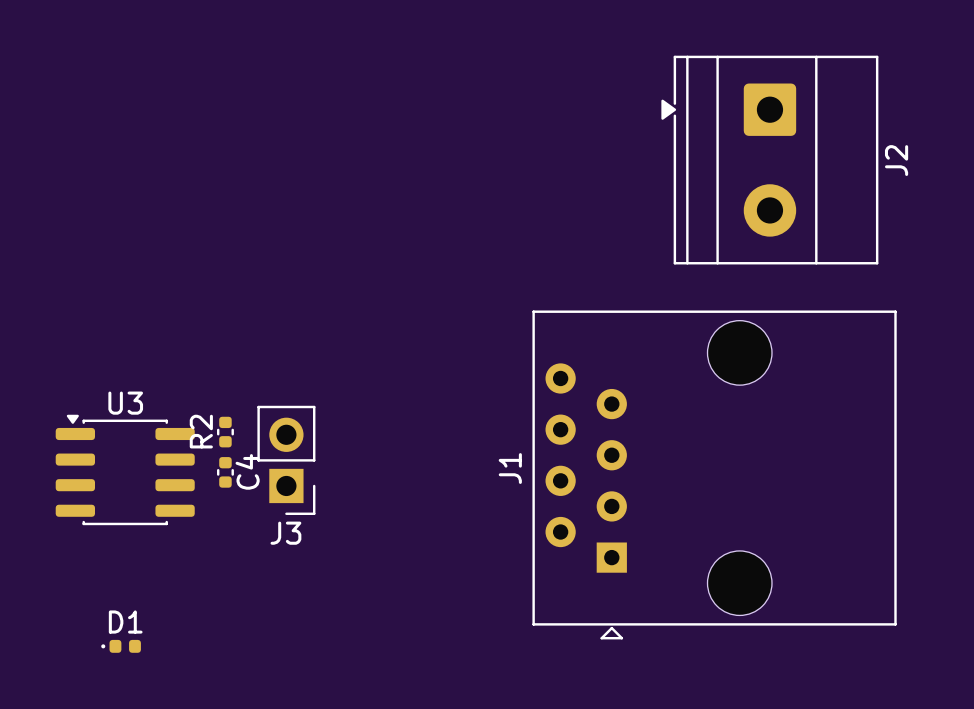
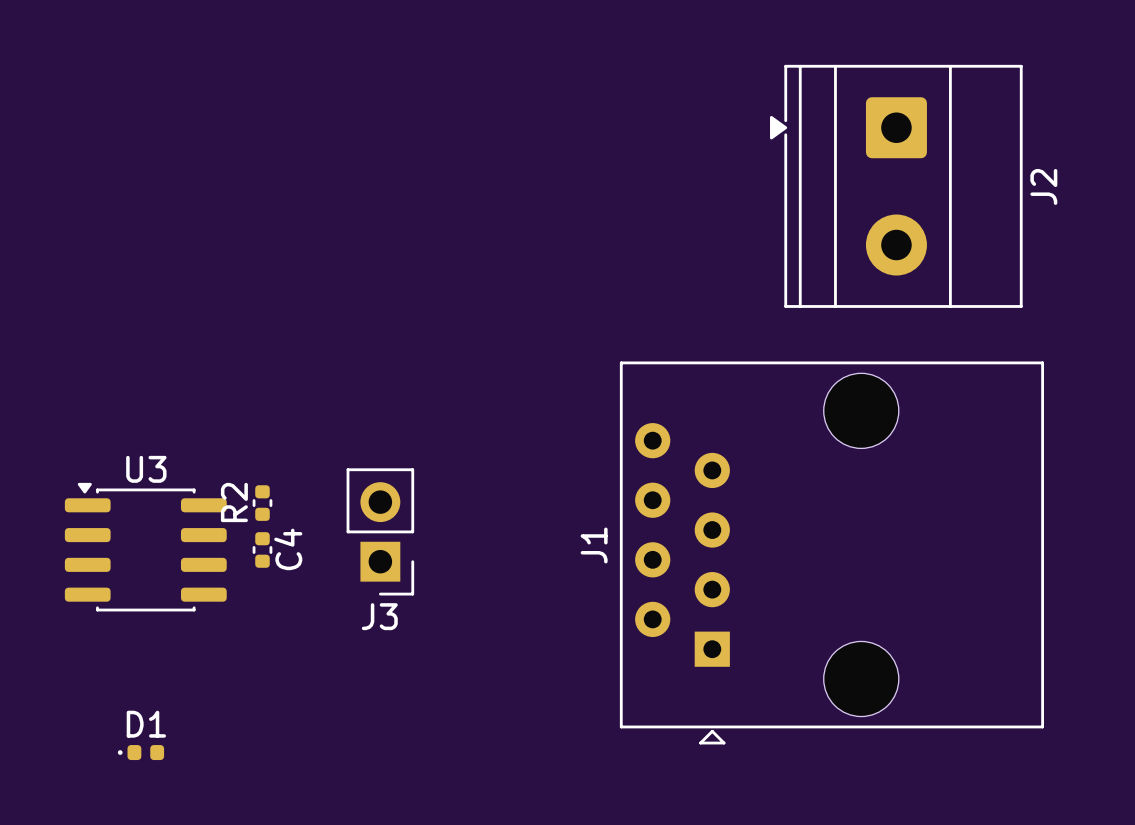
J3 position: (286, 460) -> (380, 531)

